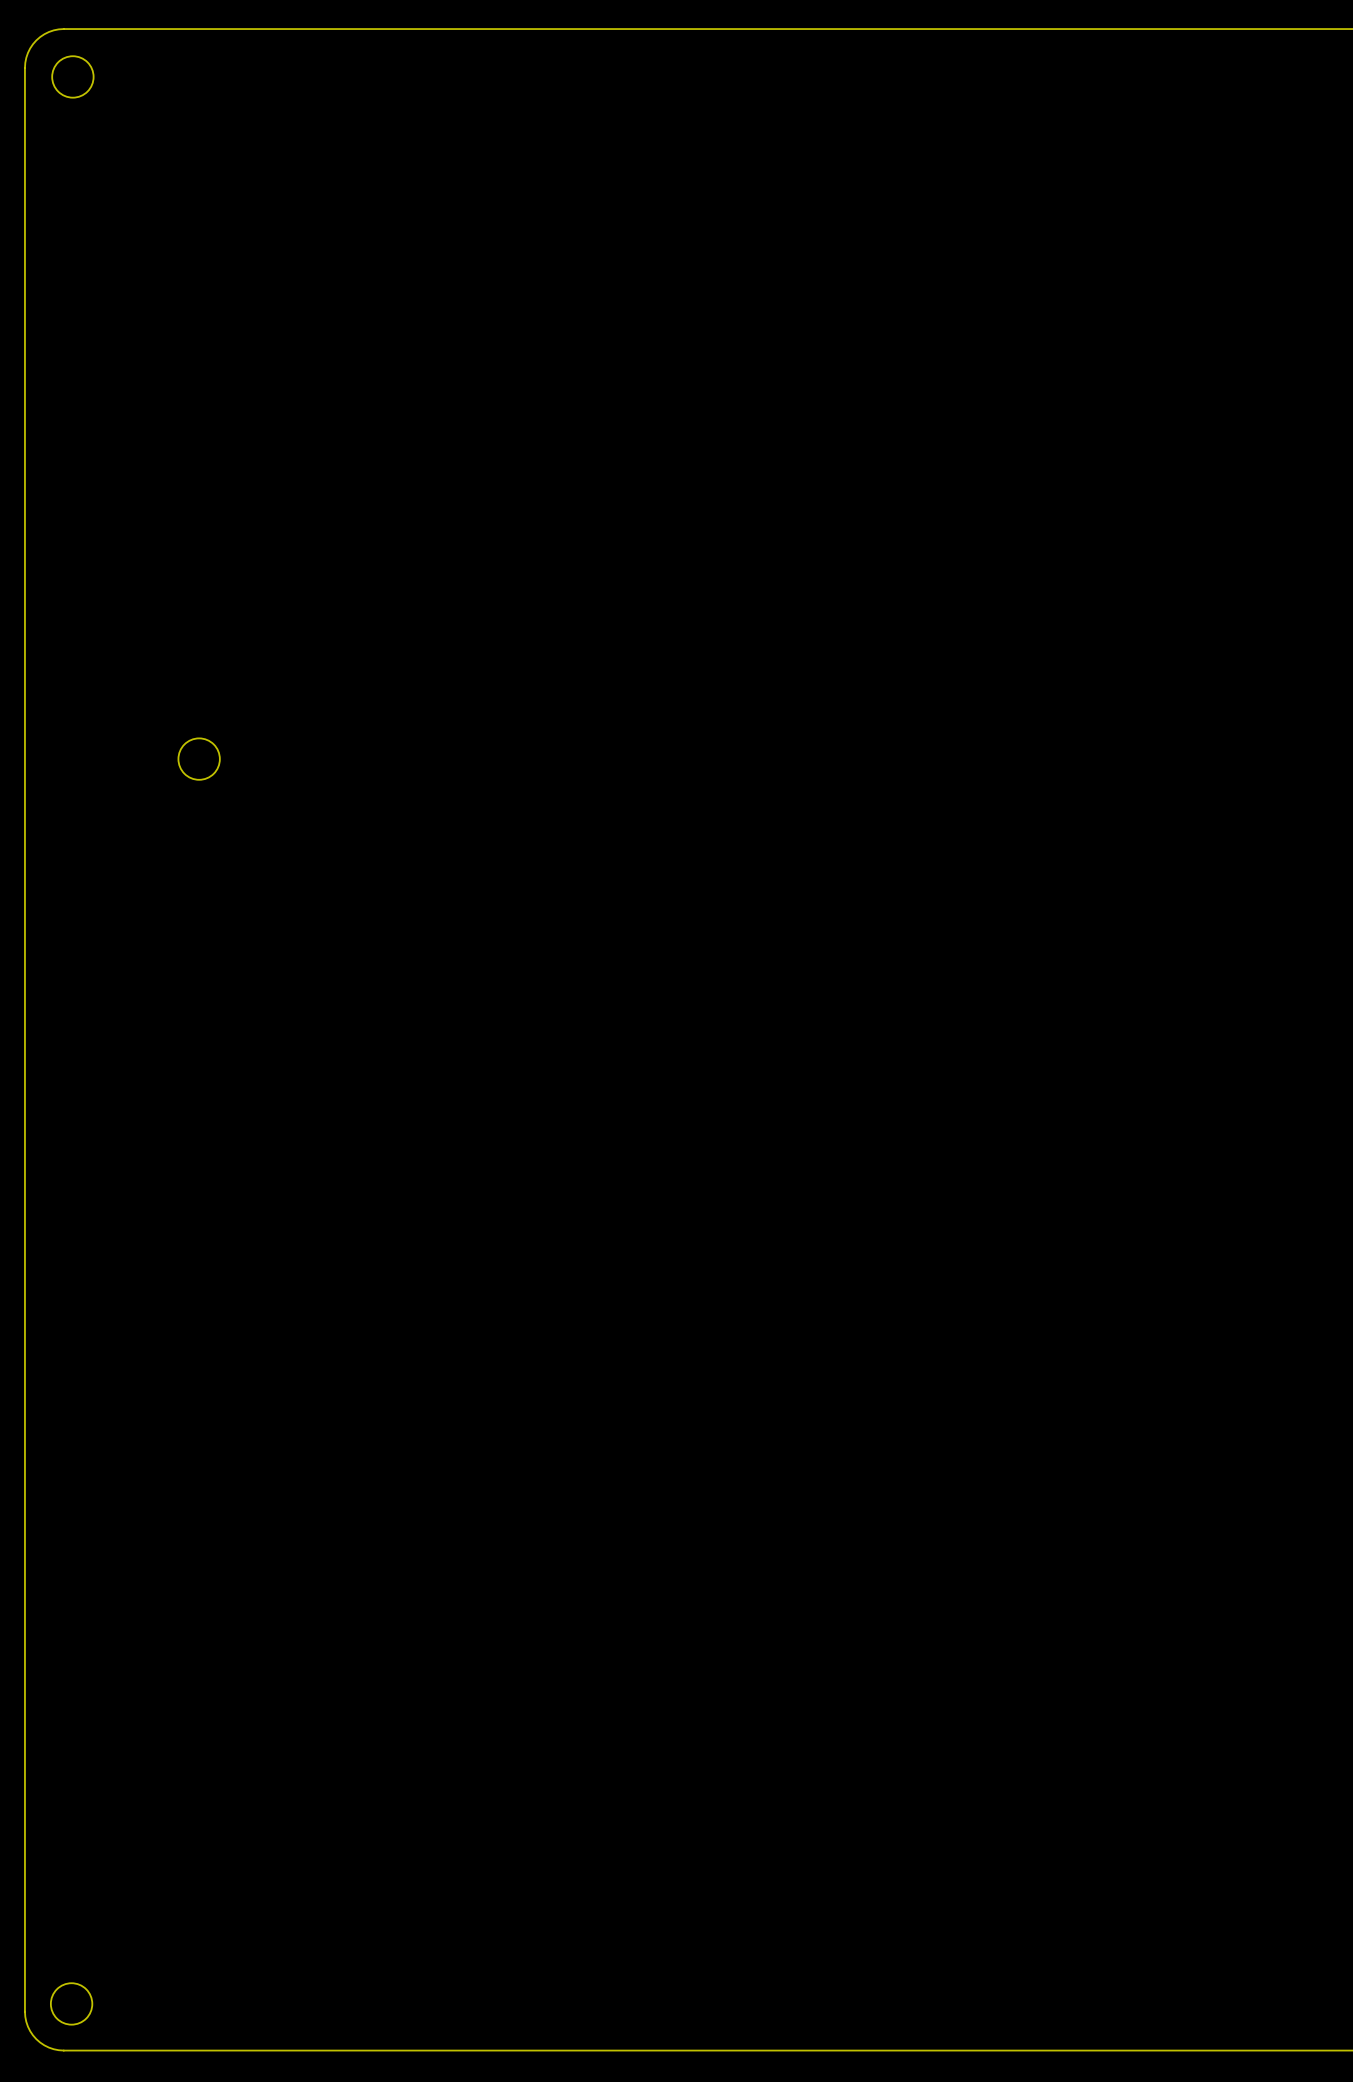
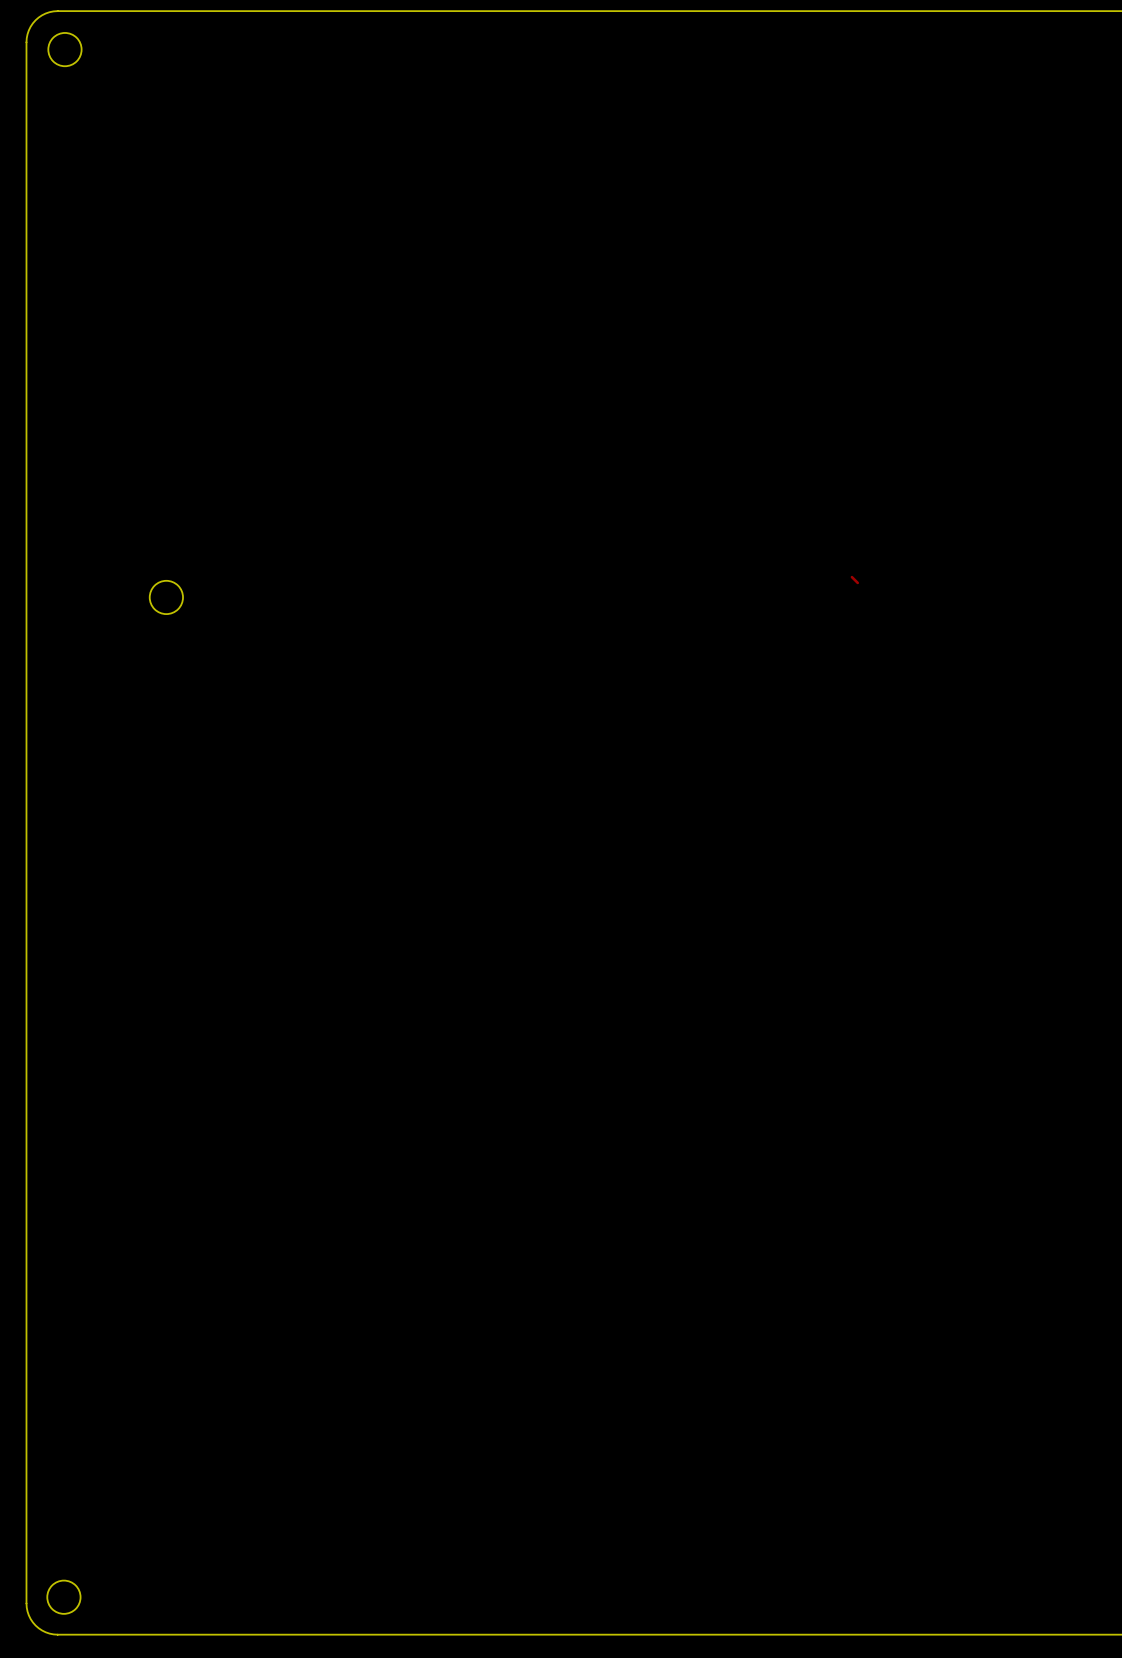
track: none -> (851, 577) (857, 582)

